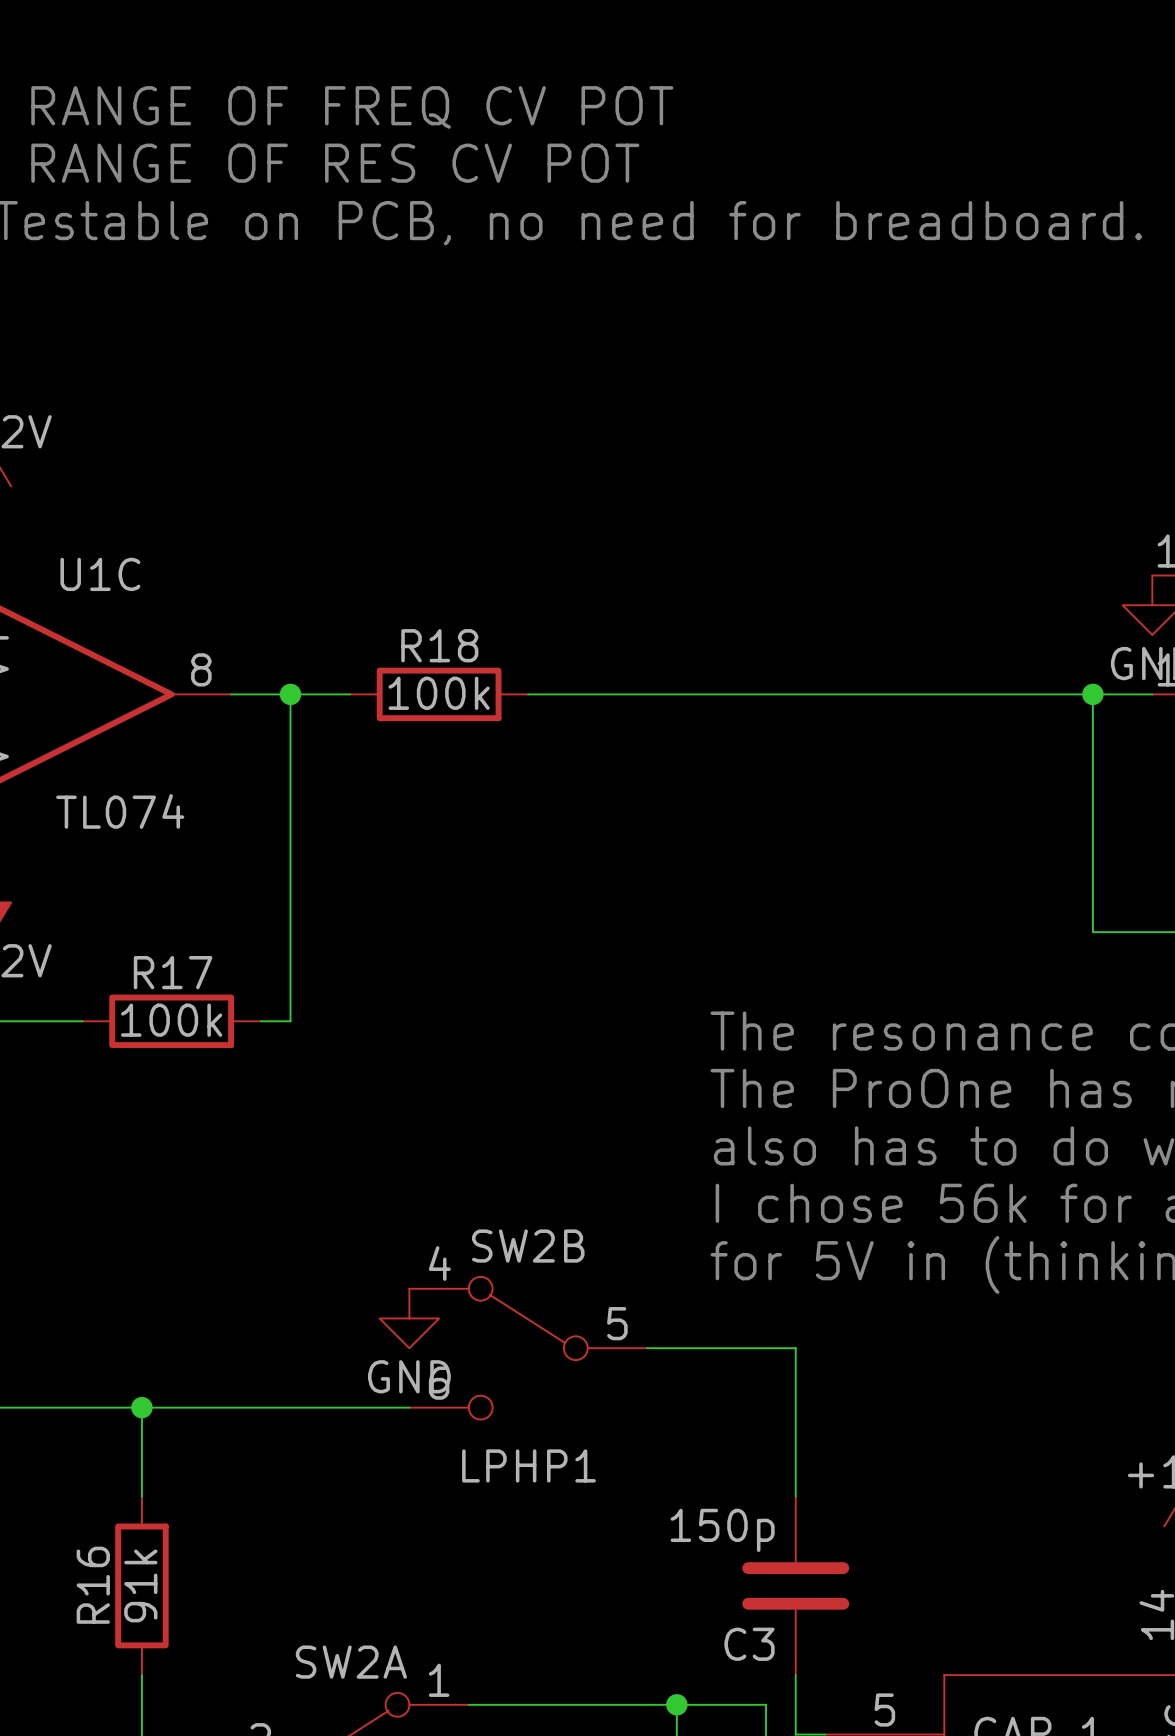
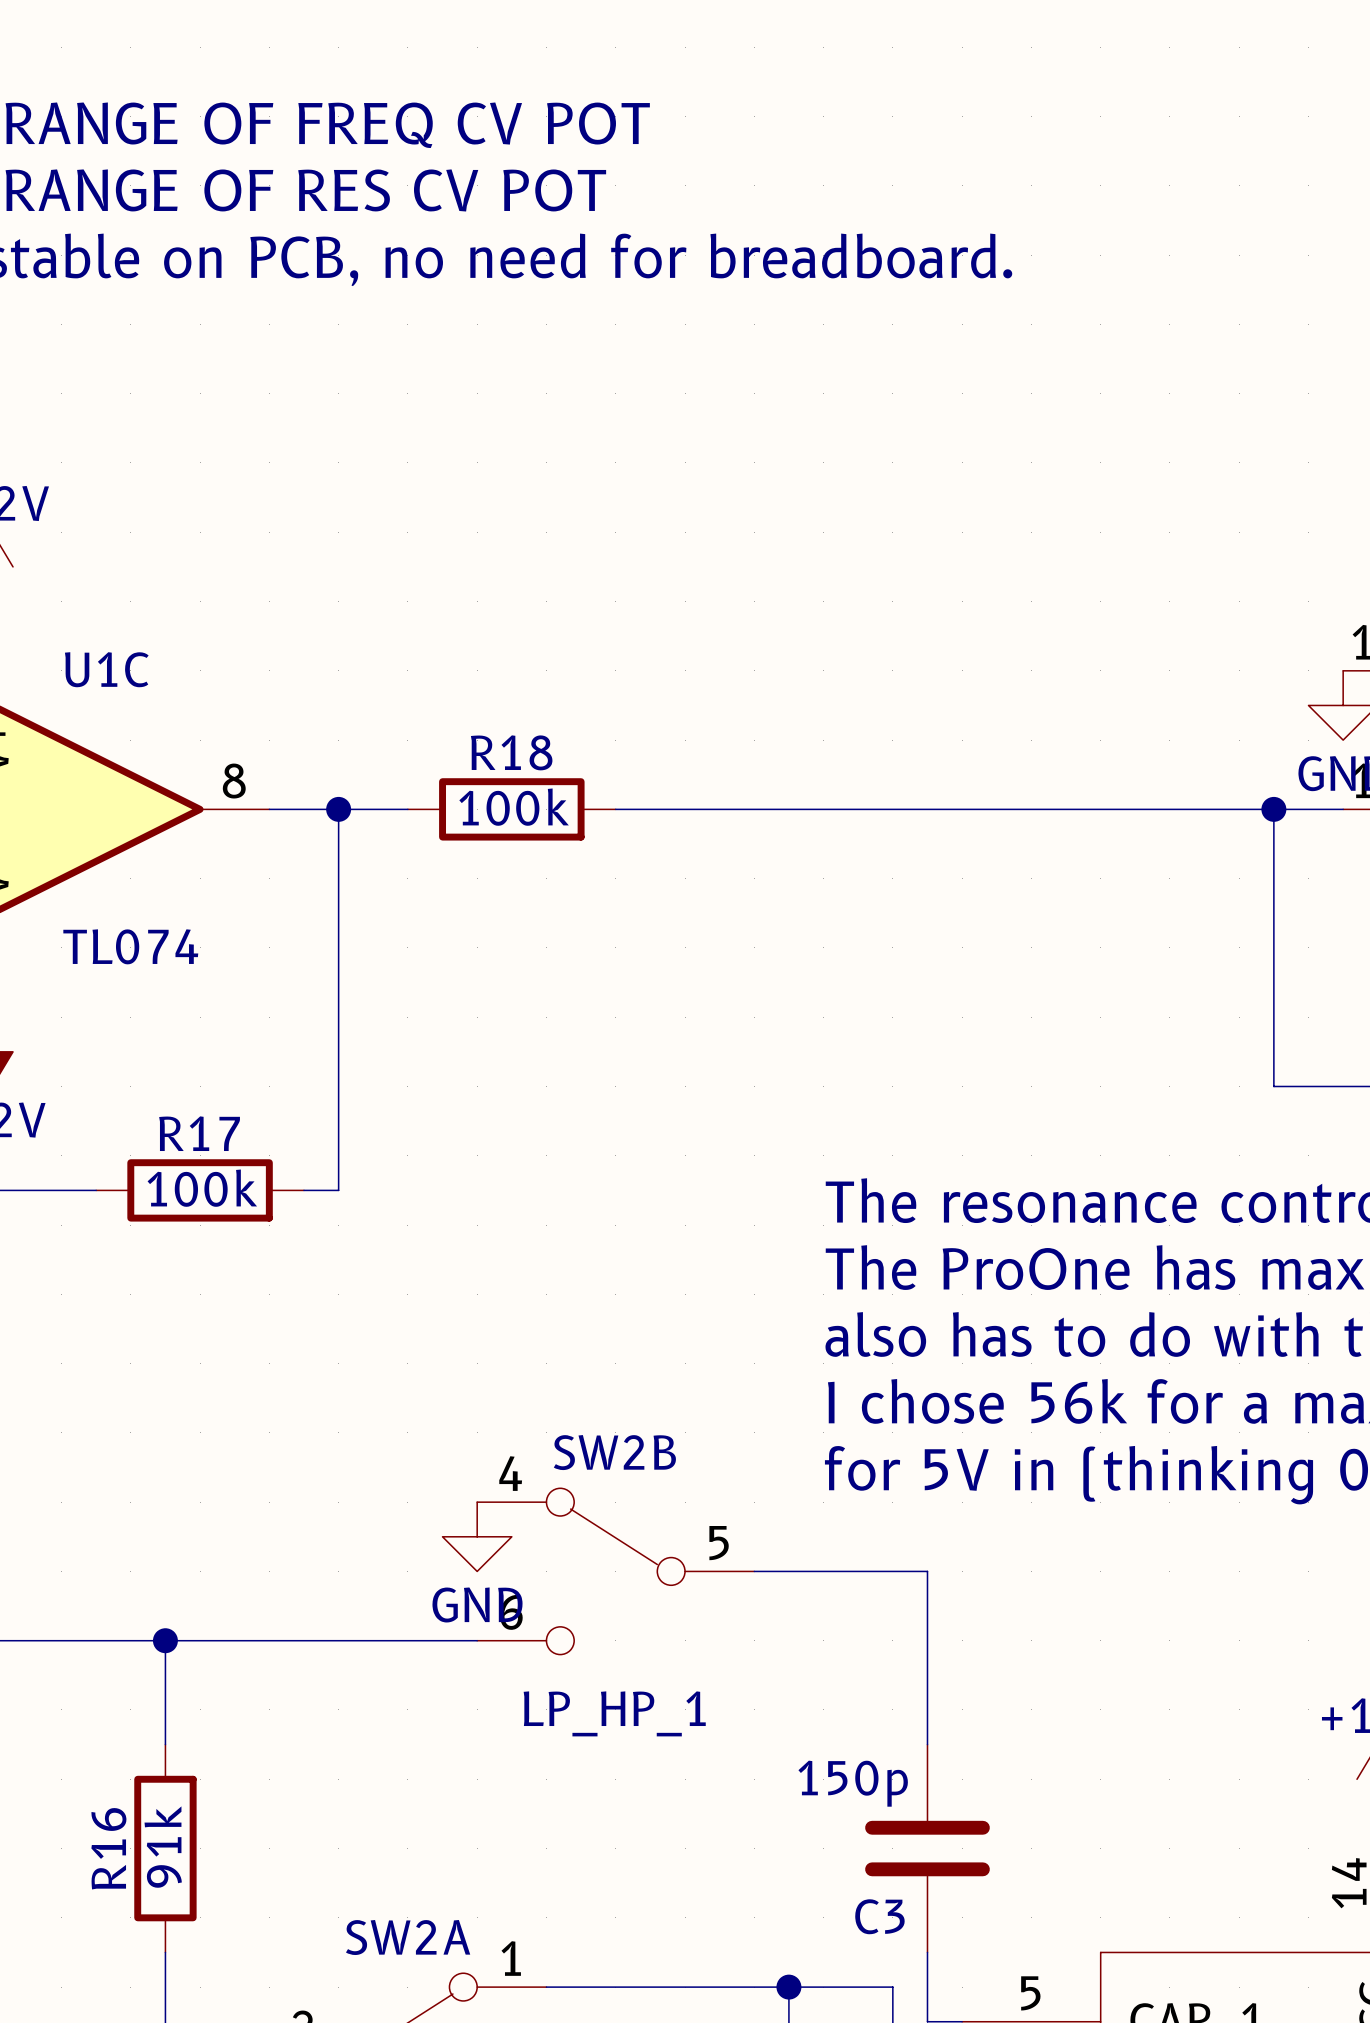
SW2B value: LPHP1 (528, 1465) -> LP_HP_1 (614, 1713)

